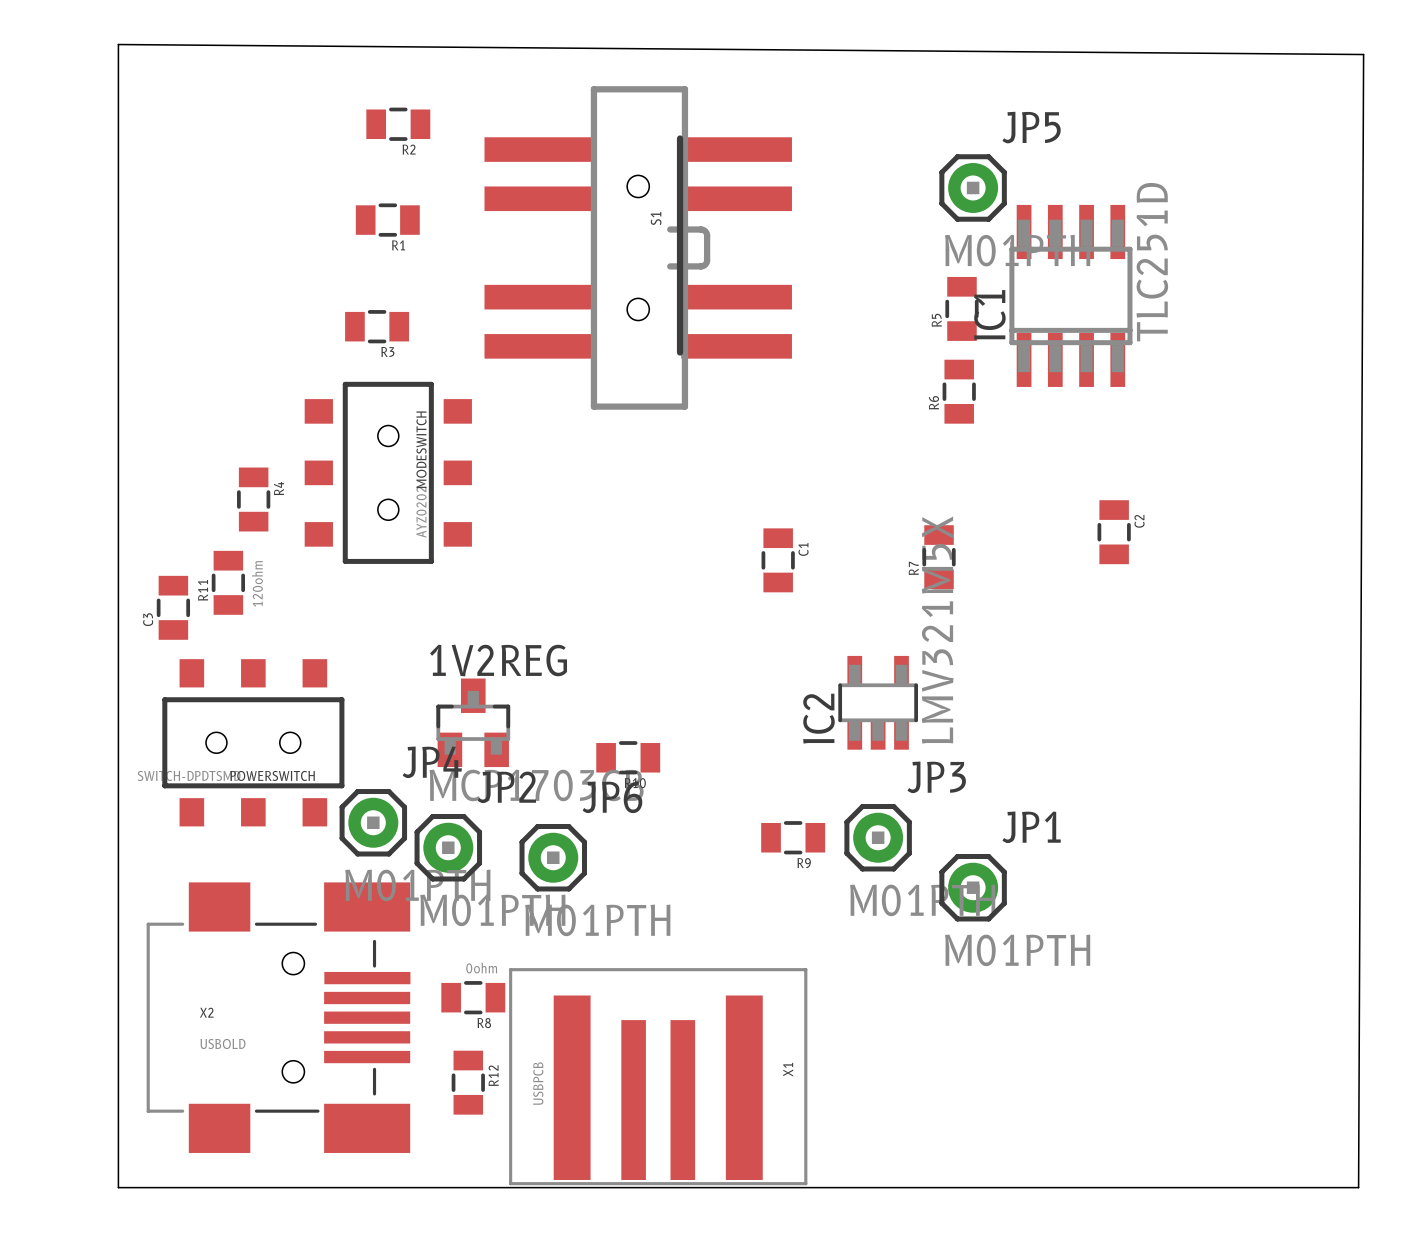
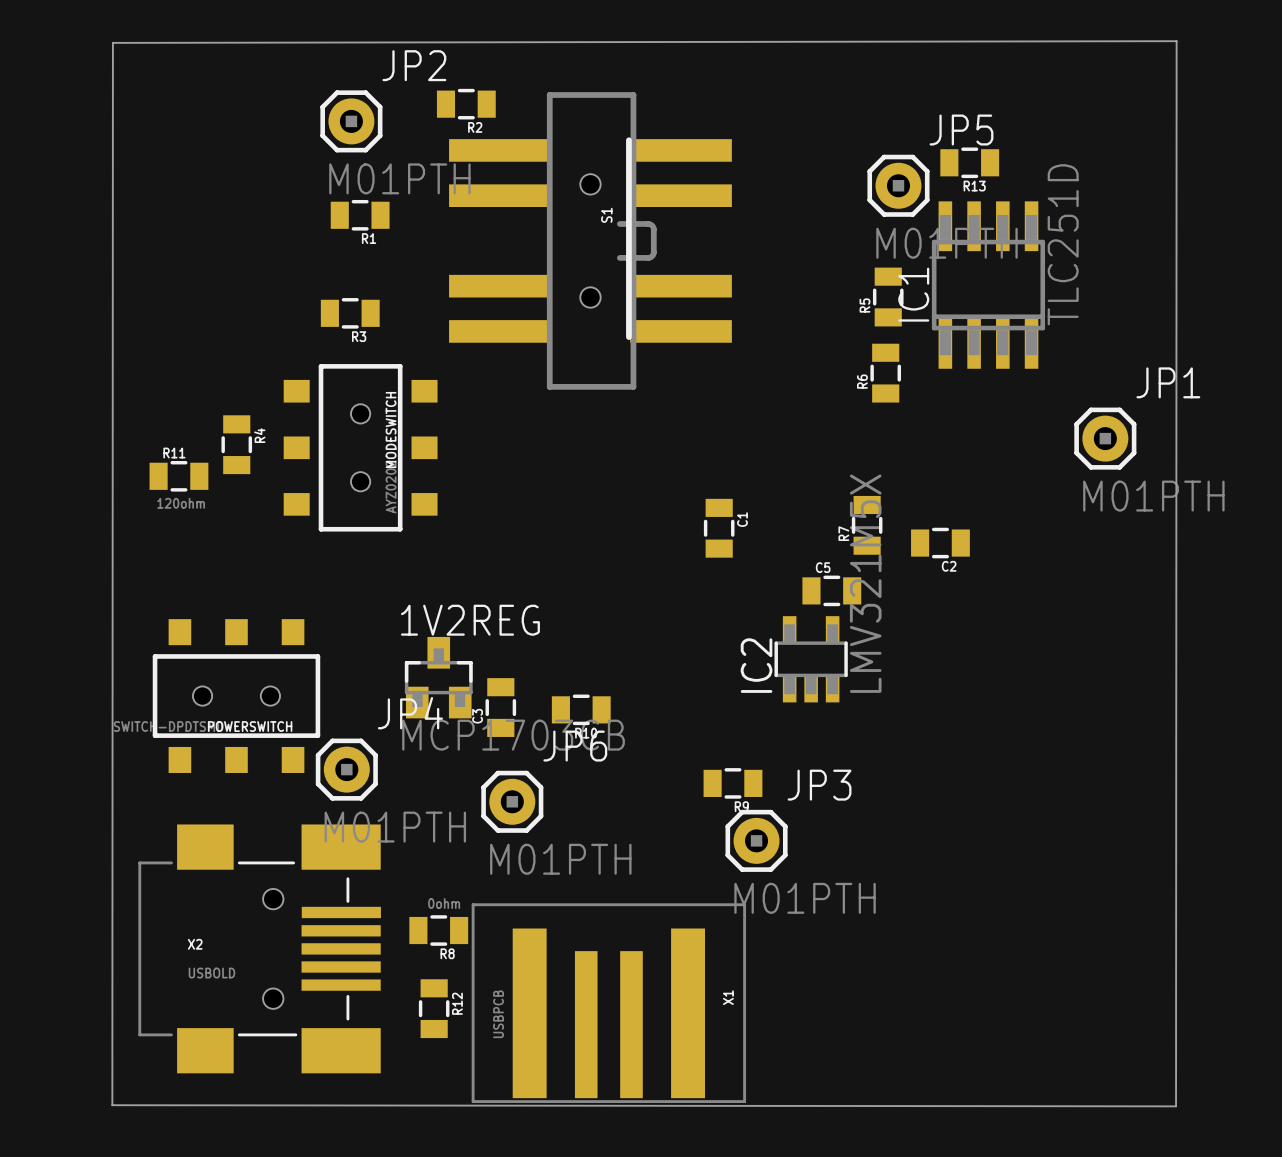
board edge: (118, 44) (1363, 54) (1358, 1187) (118, 1187) (118, 44) -> (1176, 41) (112, 42) (112, 1105) (1176, 1106) (1176, 41)
R2 position: (398, 124) -> (466, 104)
R13: none -> (969, 162)
R4 position: (253, 499) -> (236, 444)
C2 rotation: 0° (1114, 532) -> 90° clockwise (940, 543)
C2 position: (1114, 532) -> (940, 543)
R11 rotation: 0° (228, 582) -> 90° clockwise (178, 476)
R11 position: (228, 582) -> (178, 476)
C3 position: (173, 607) -> (500, 707)
C5: none -> (831, 590)
JP3 position: (878, 837) -> (756, 840)
JP2 position: (448, 847) -> (351, 121)
JP1 position: (973, 887) -> (1105, 438)

